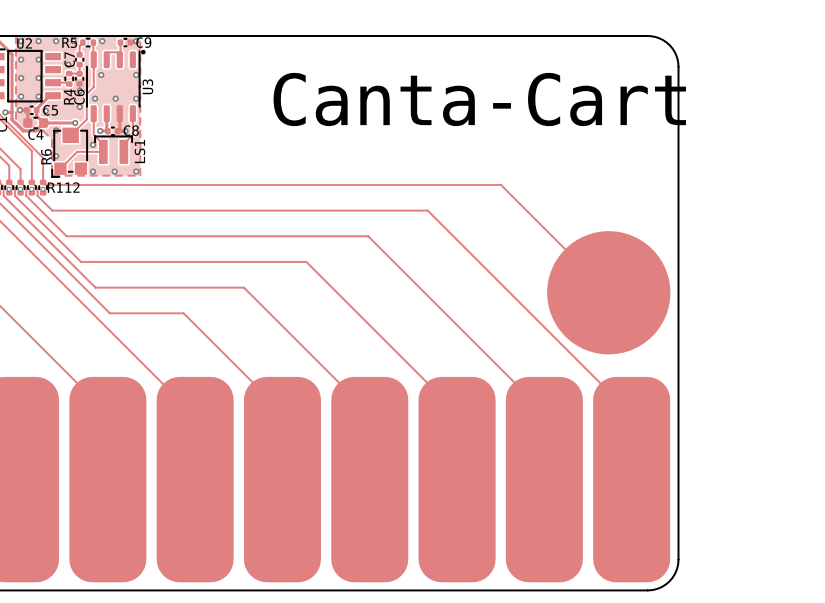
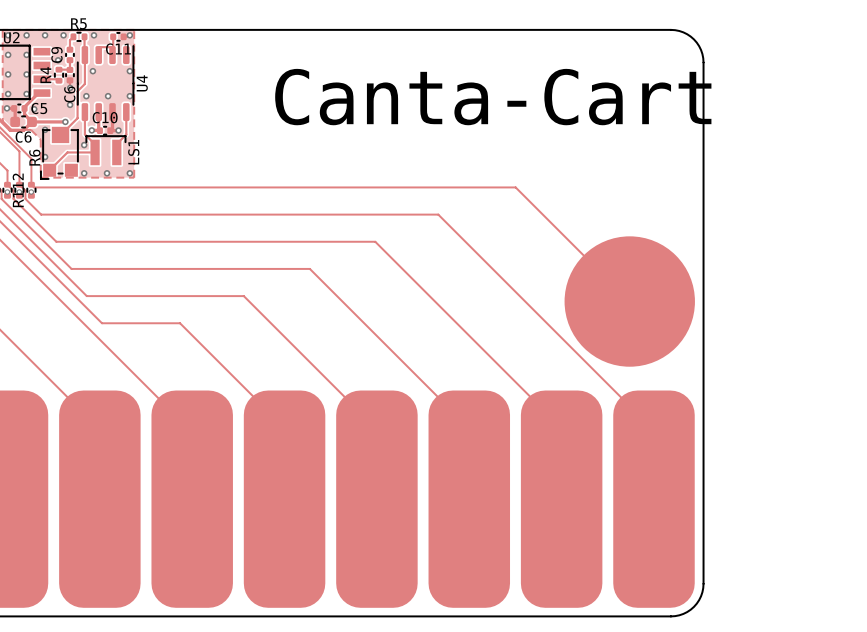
R5 name position: R5 (69, 42) -> R5 (78, 23)
C9 name: C9 (143, 42) -> C11 (118, 49)
drawing: [140, 49, 146, 55] -> none
C7 name: C7 (69, 59) -> C9 (56, 54)
U3 name: U3 (147, 86) -> U4 (142, 83)
R4 name position: R4 (69, 96) -> R4 (45, 75)
C8 name: C8 (131, 130) -> C10 (105, 117)
C4 name: C4 (35, 134) -> C6 (23, 137)
R112 name rotation: 0° (63, 187) -> 90° counterclockwise (18, 190)

